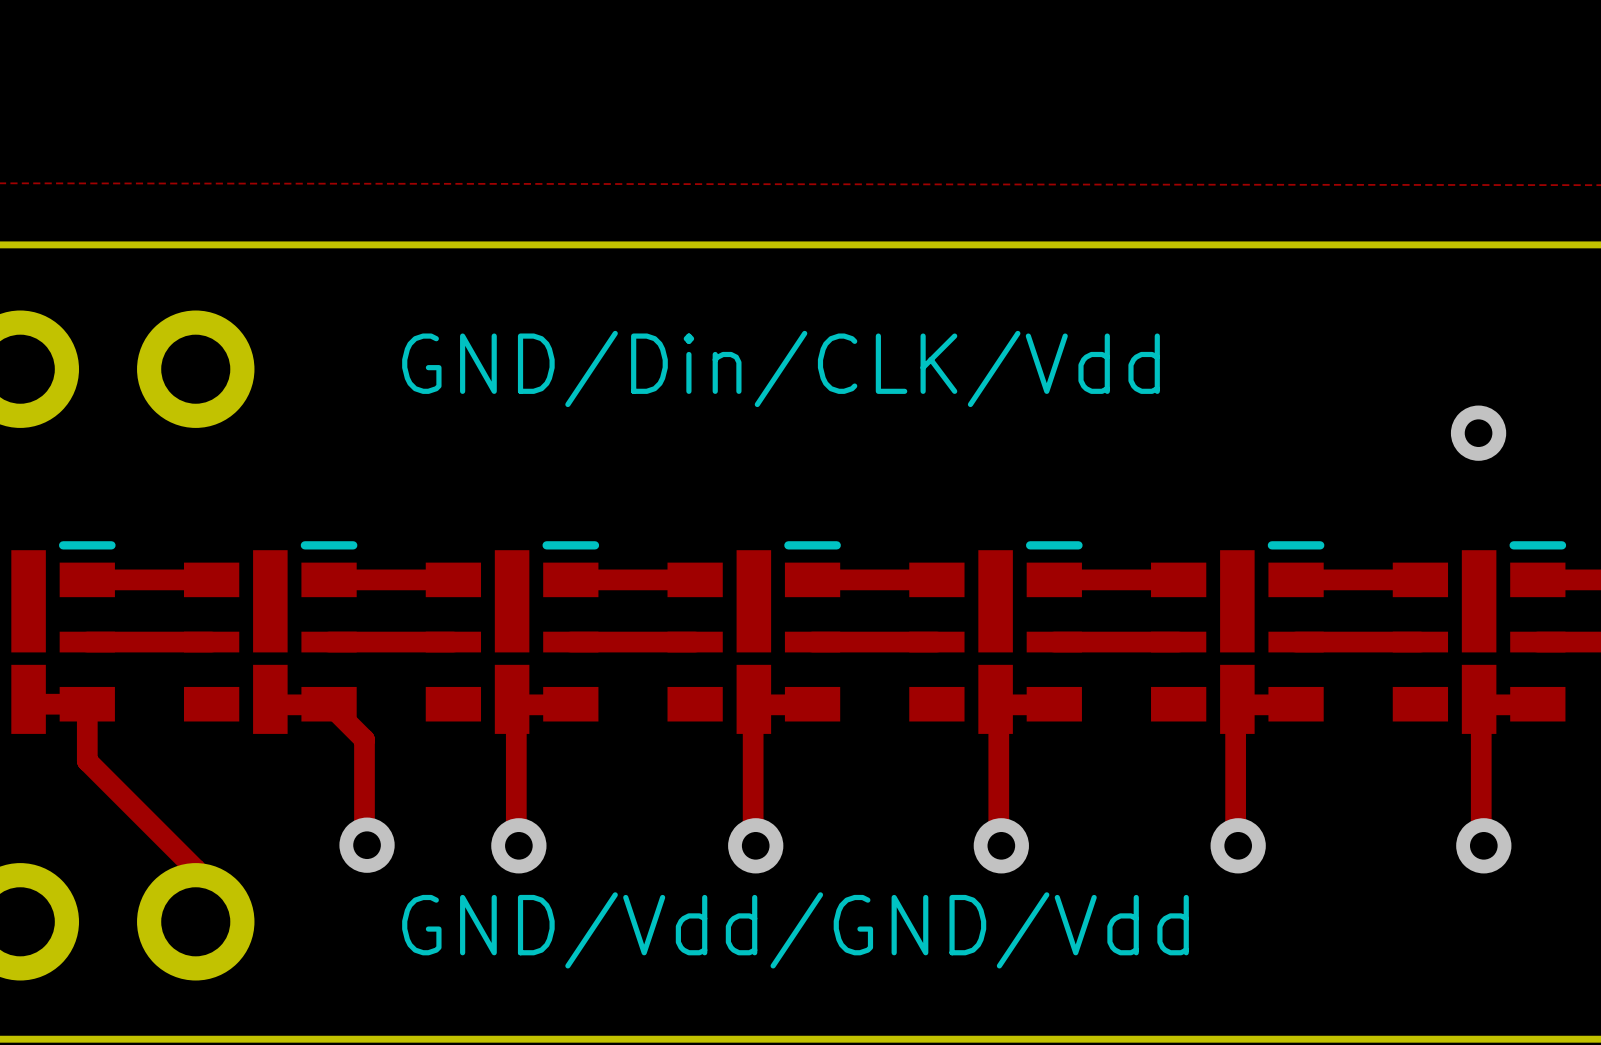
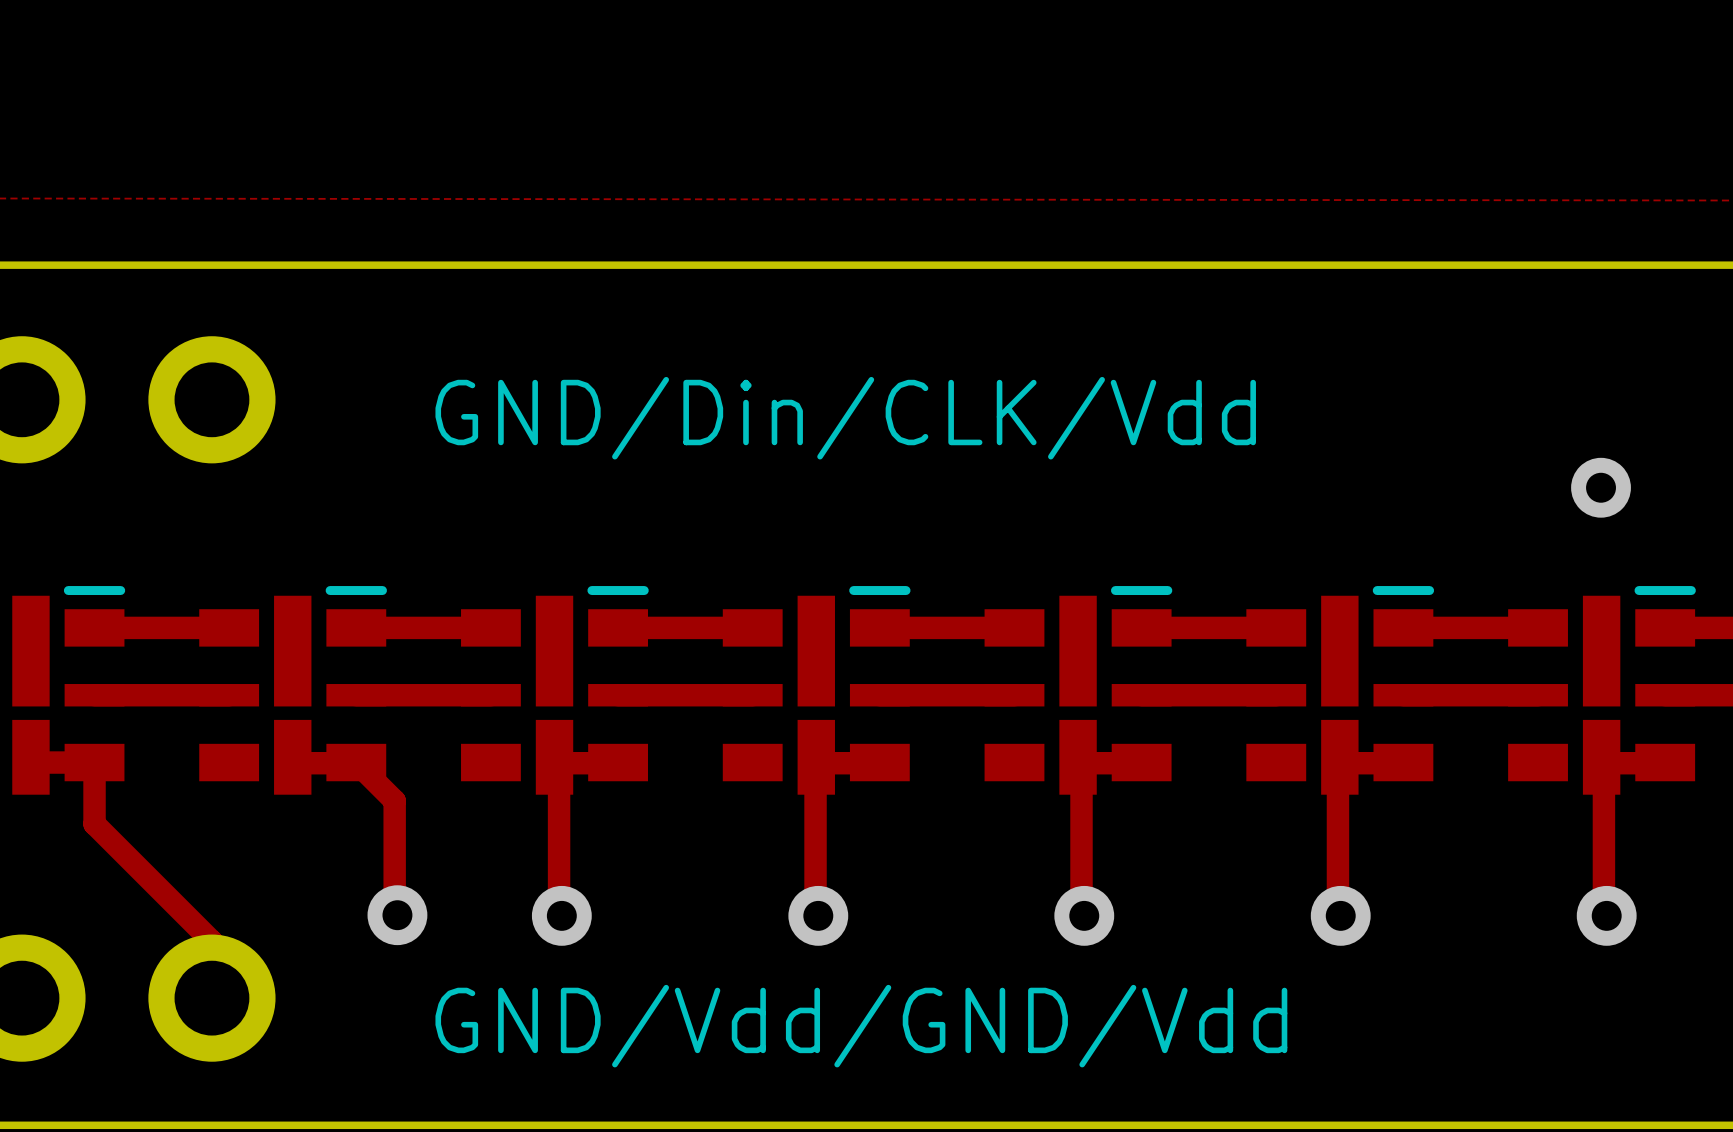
text position: GND/Din/CLK/Vdd (781, 368) -> GND/Din/CLK/Vdd (845, 418)
via position: (1478, 433) -> (1601, 487)
text position: GND/Vdd/GND/Vdd (795, 930) -> GND/Vdd/GND/Vdd (861, 1026)

